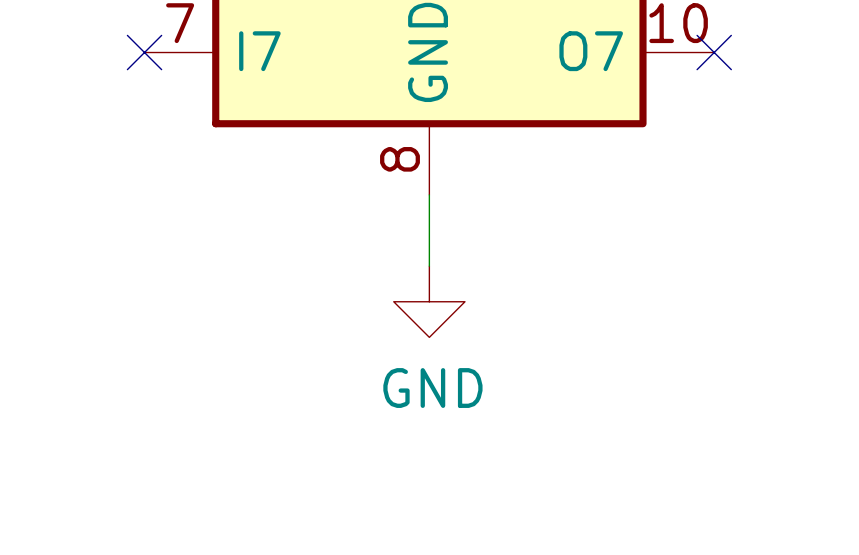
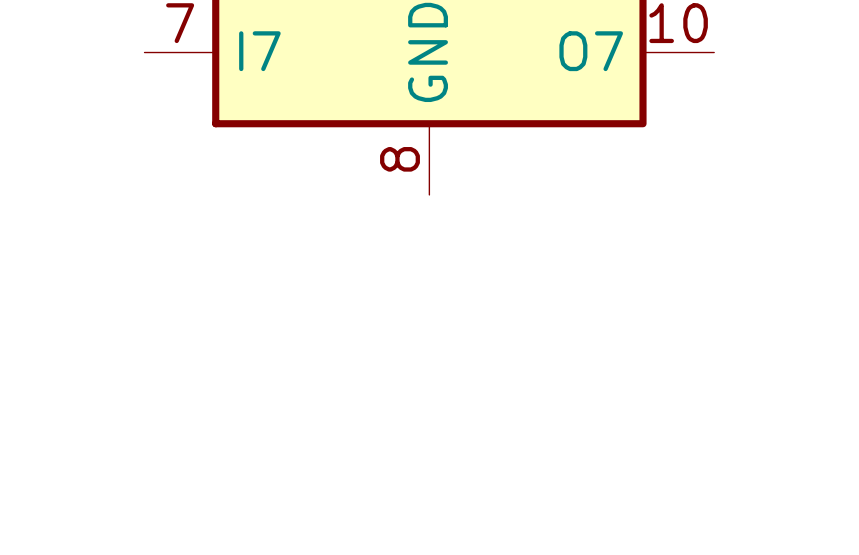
no-connect mark: (144, 52) -> none
no-connect mark: (714, 52) -> none
wire: (429, 194) (429, 266) -> none
power symbol: GND (429, 301) -> none

